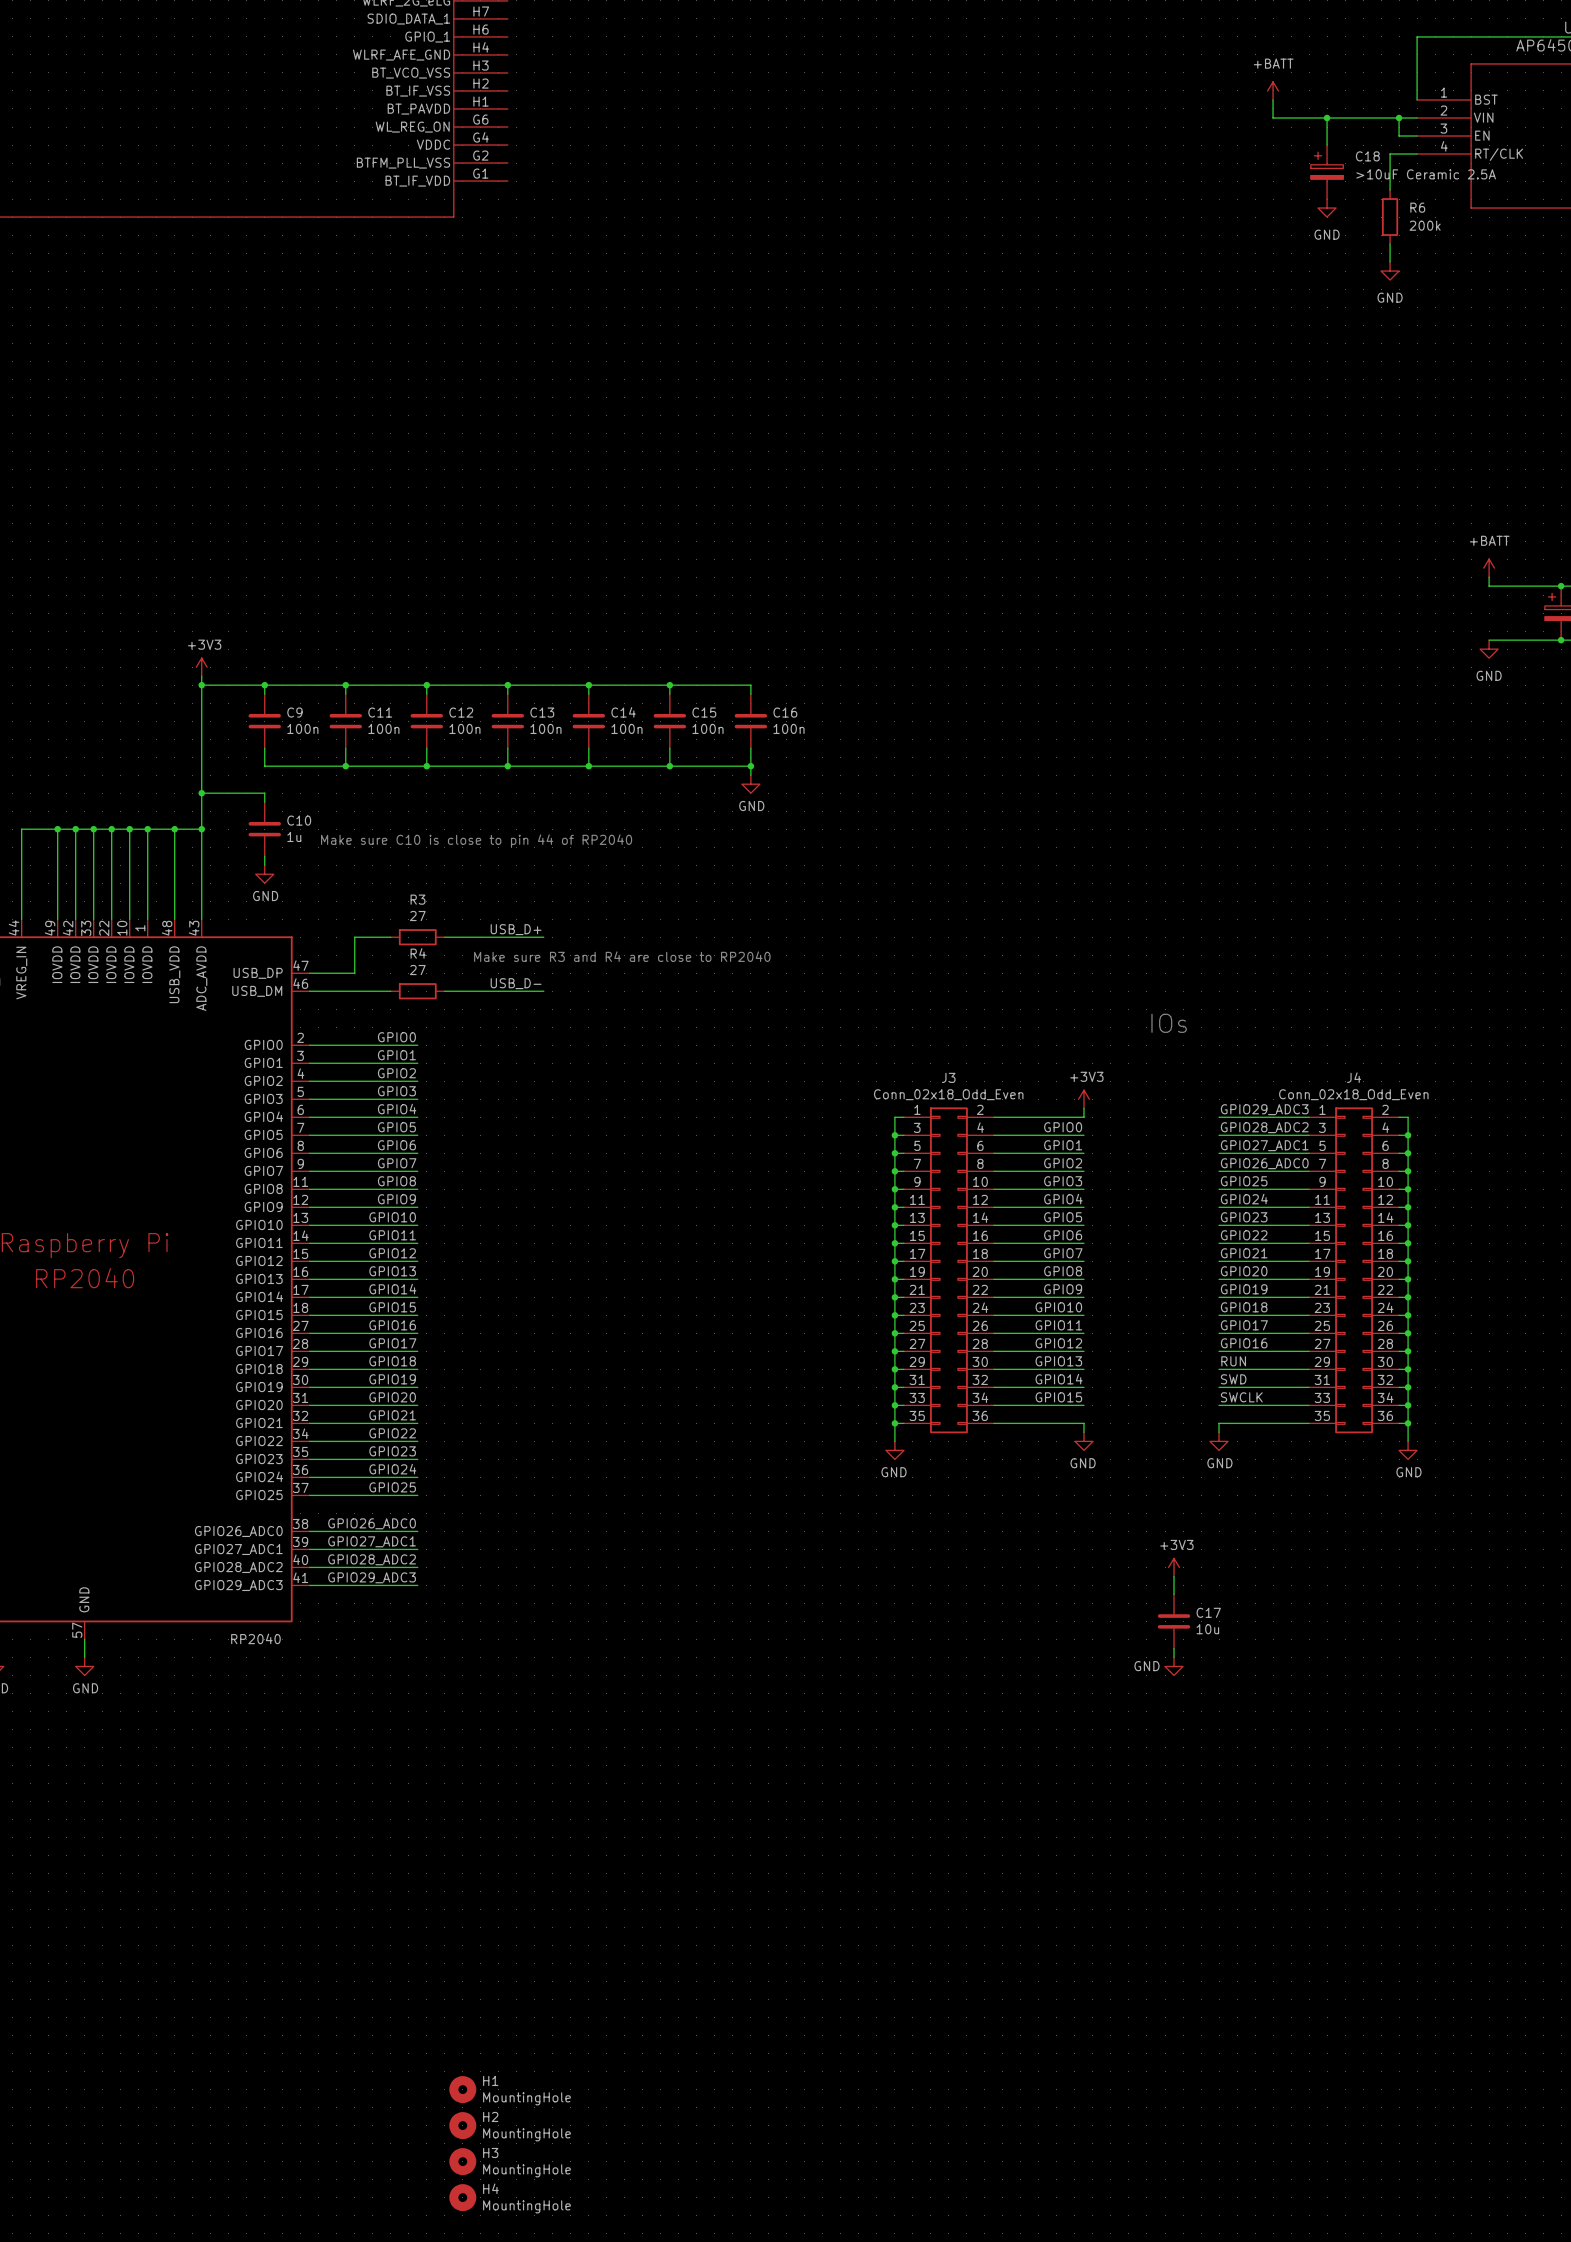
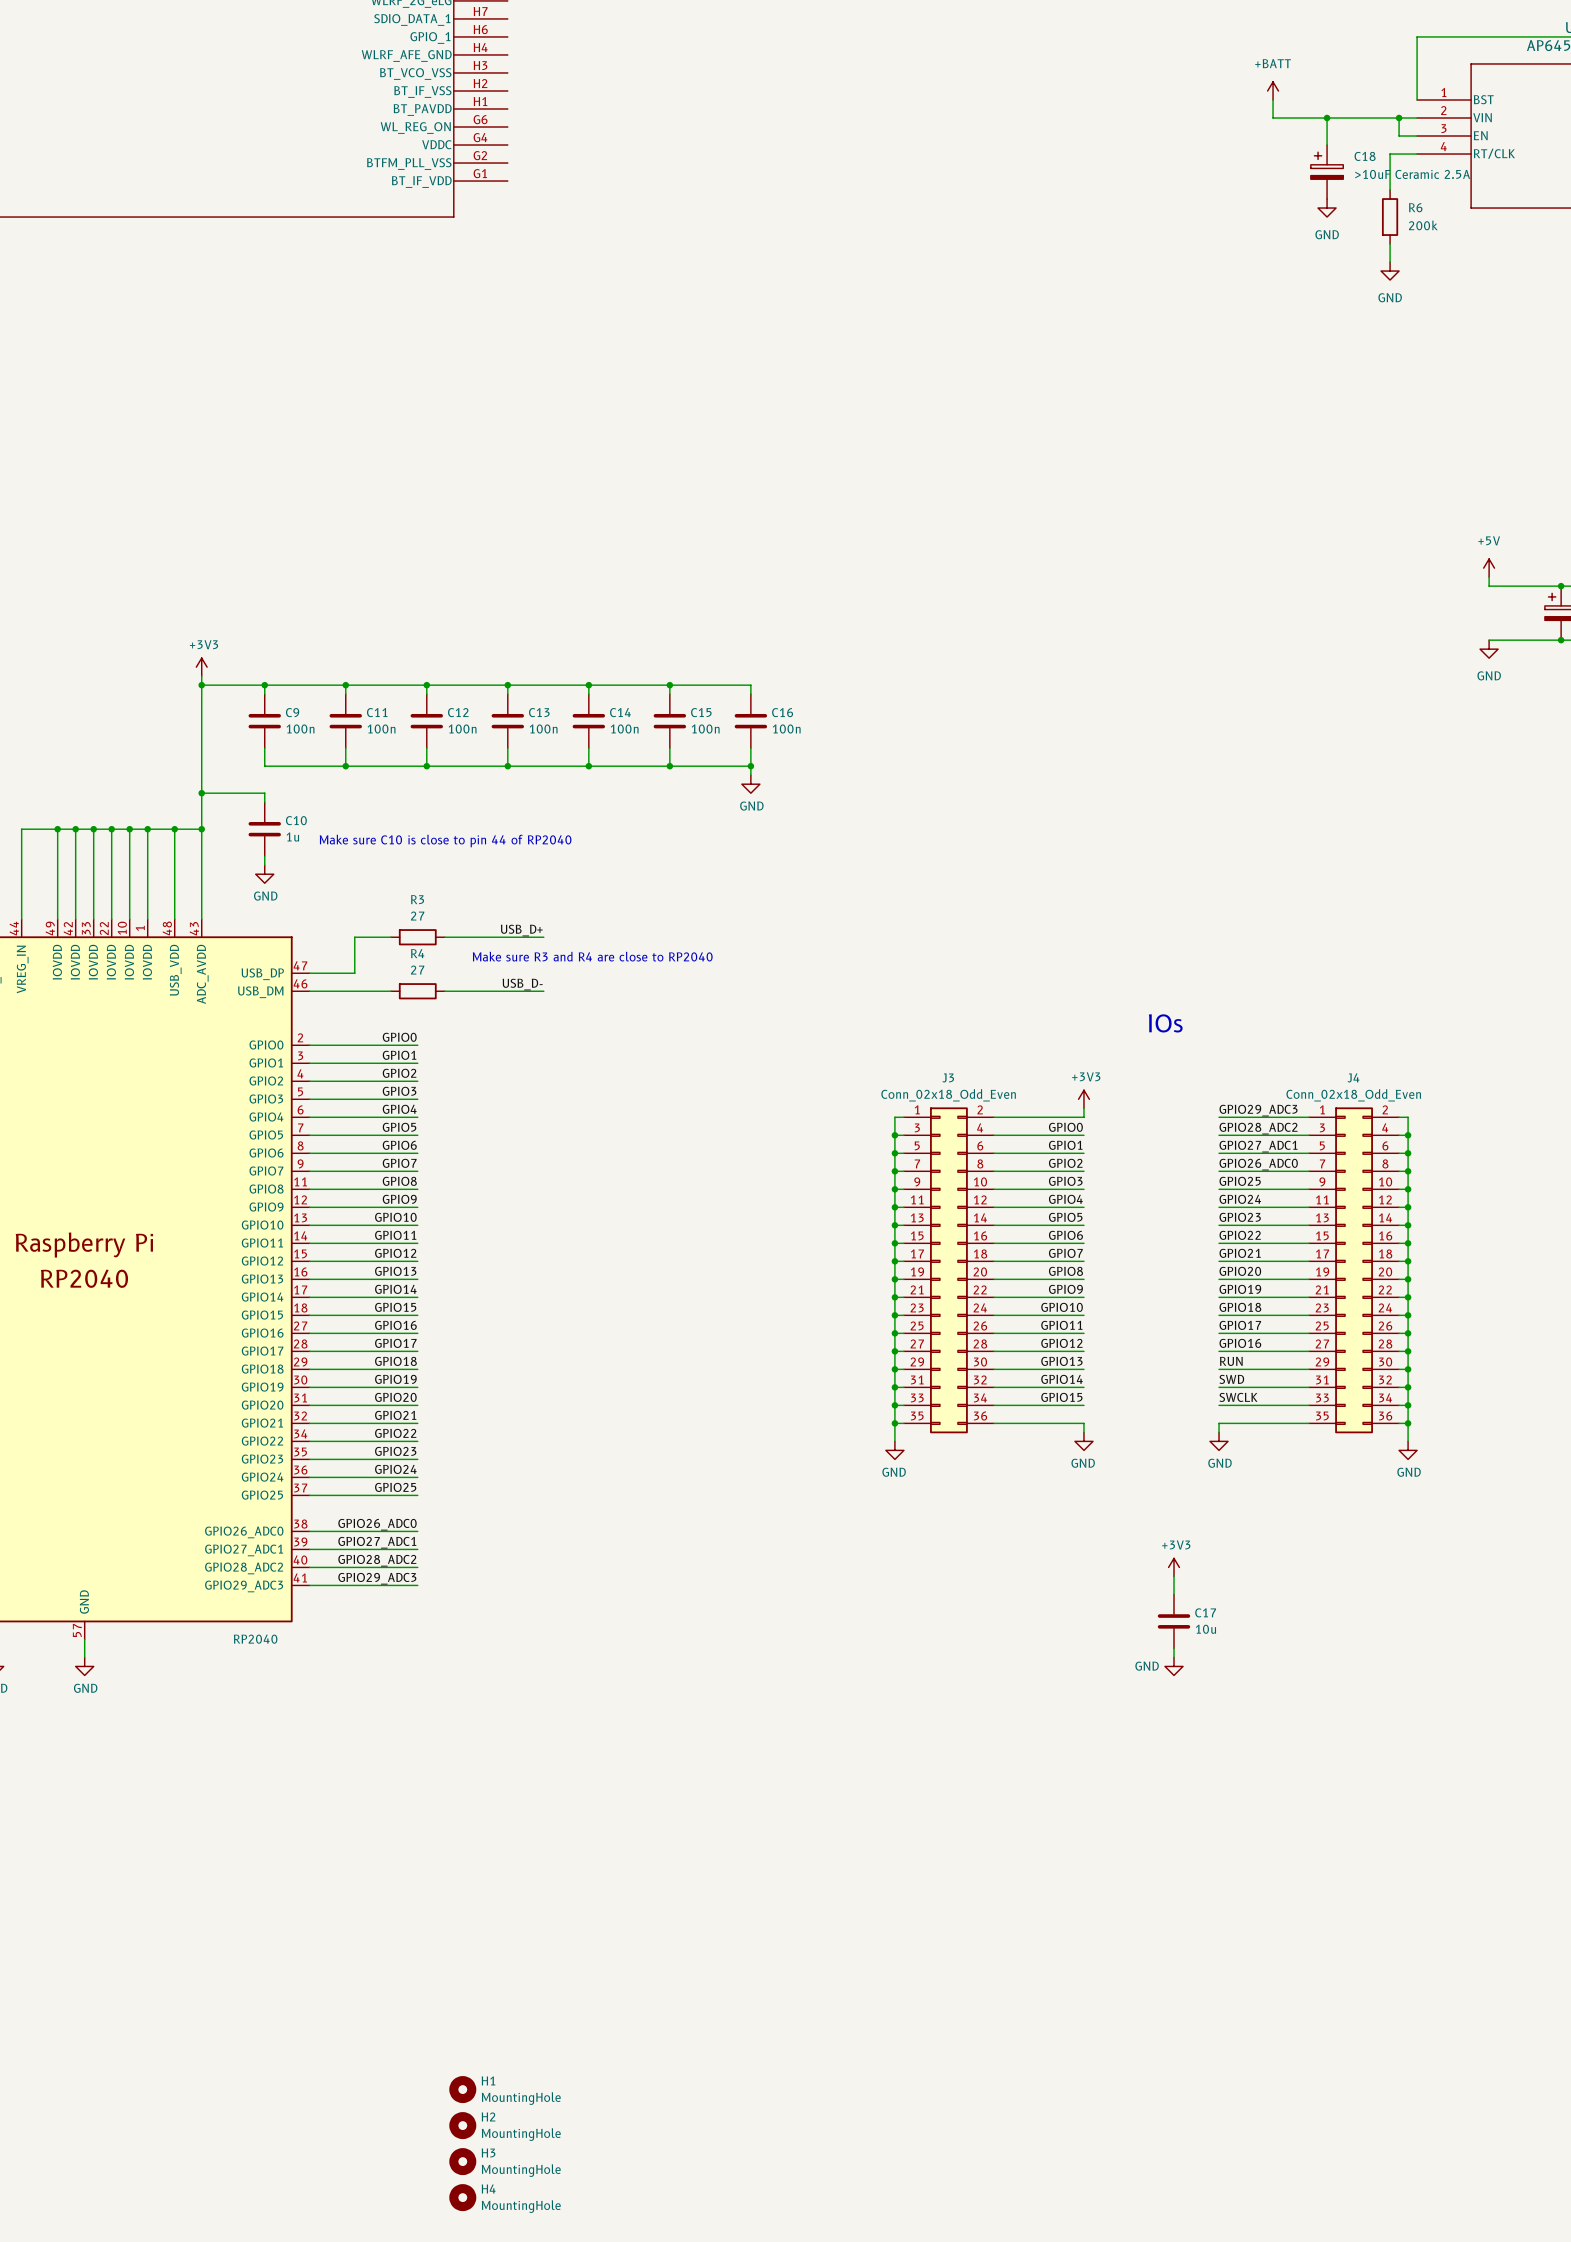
power symbol: +BATT (1489, 568) -> +5V (1489, 568)

